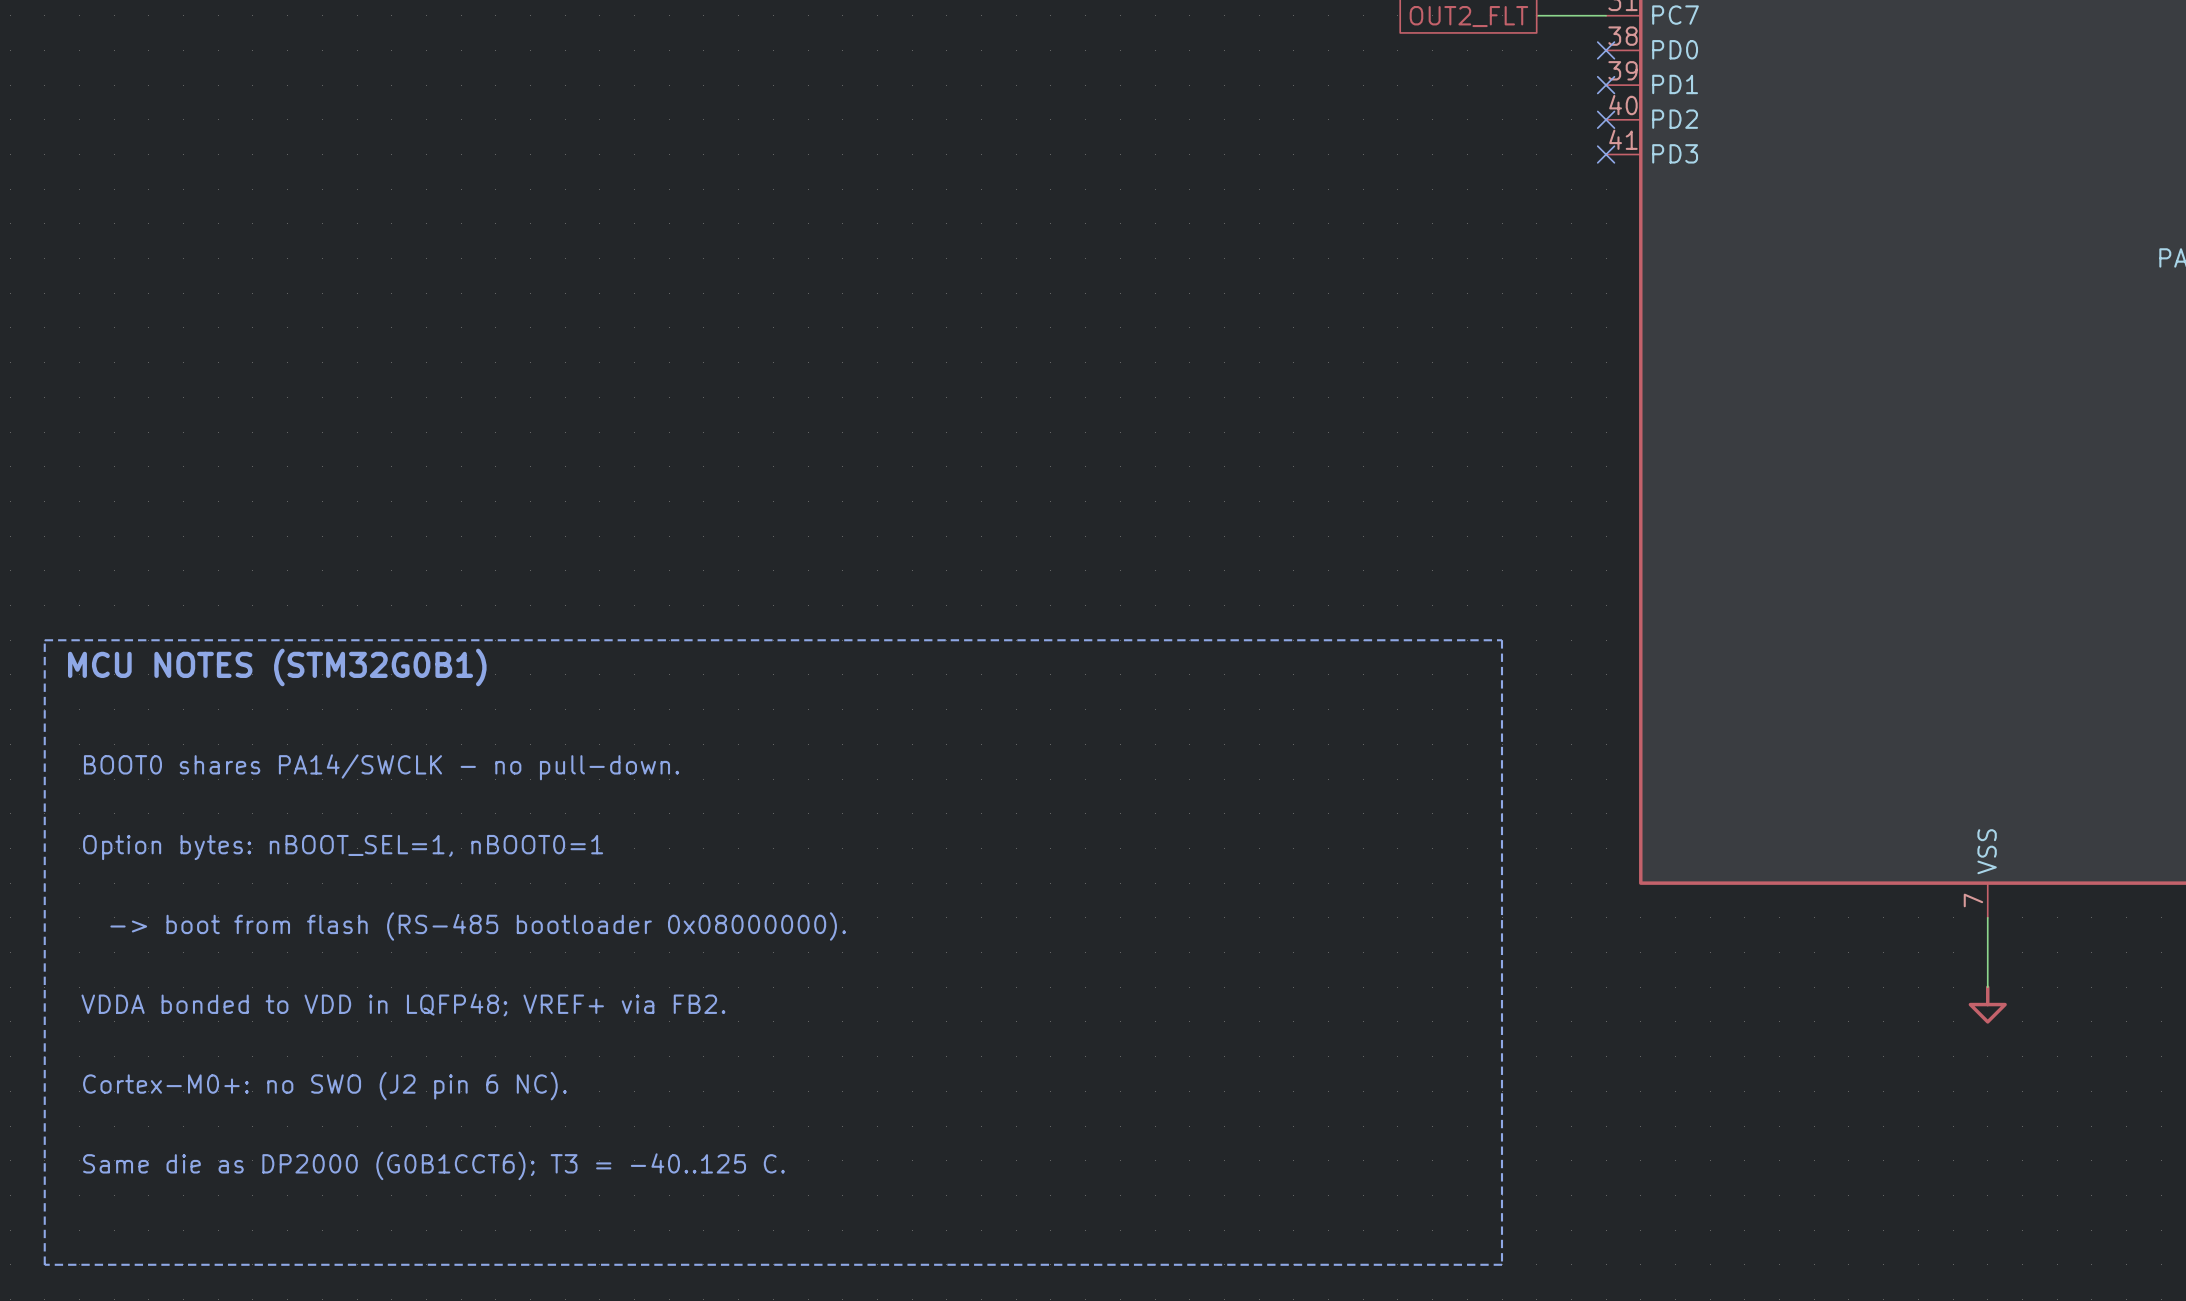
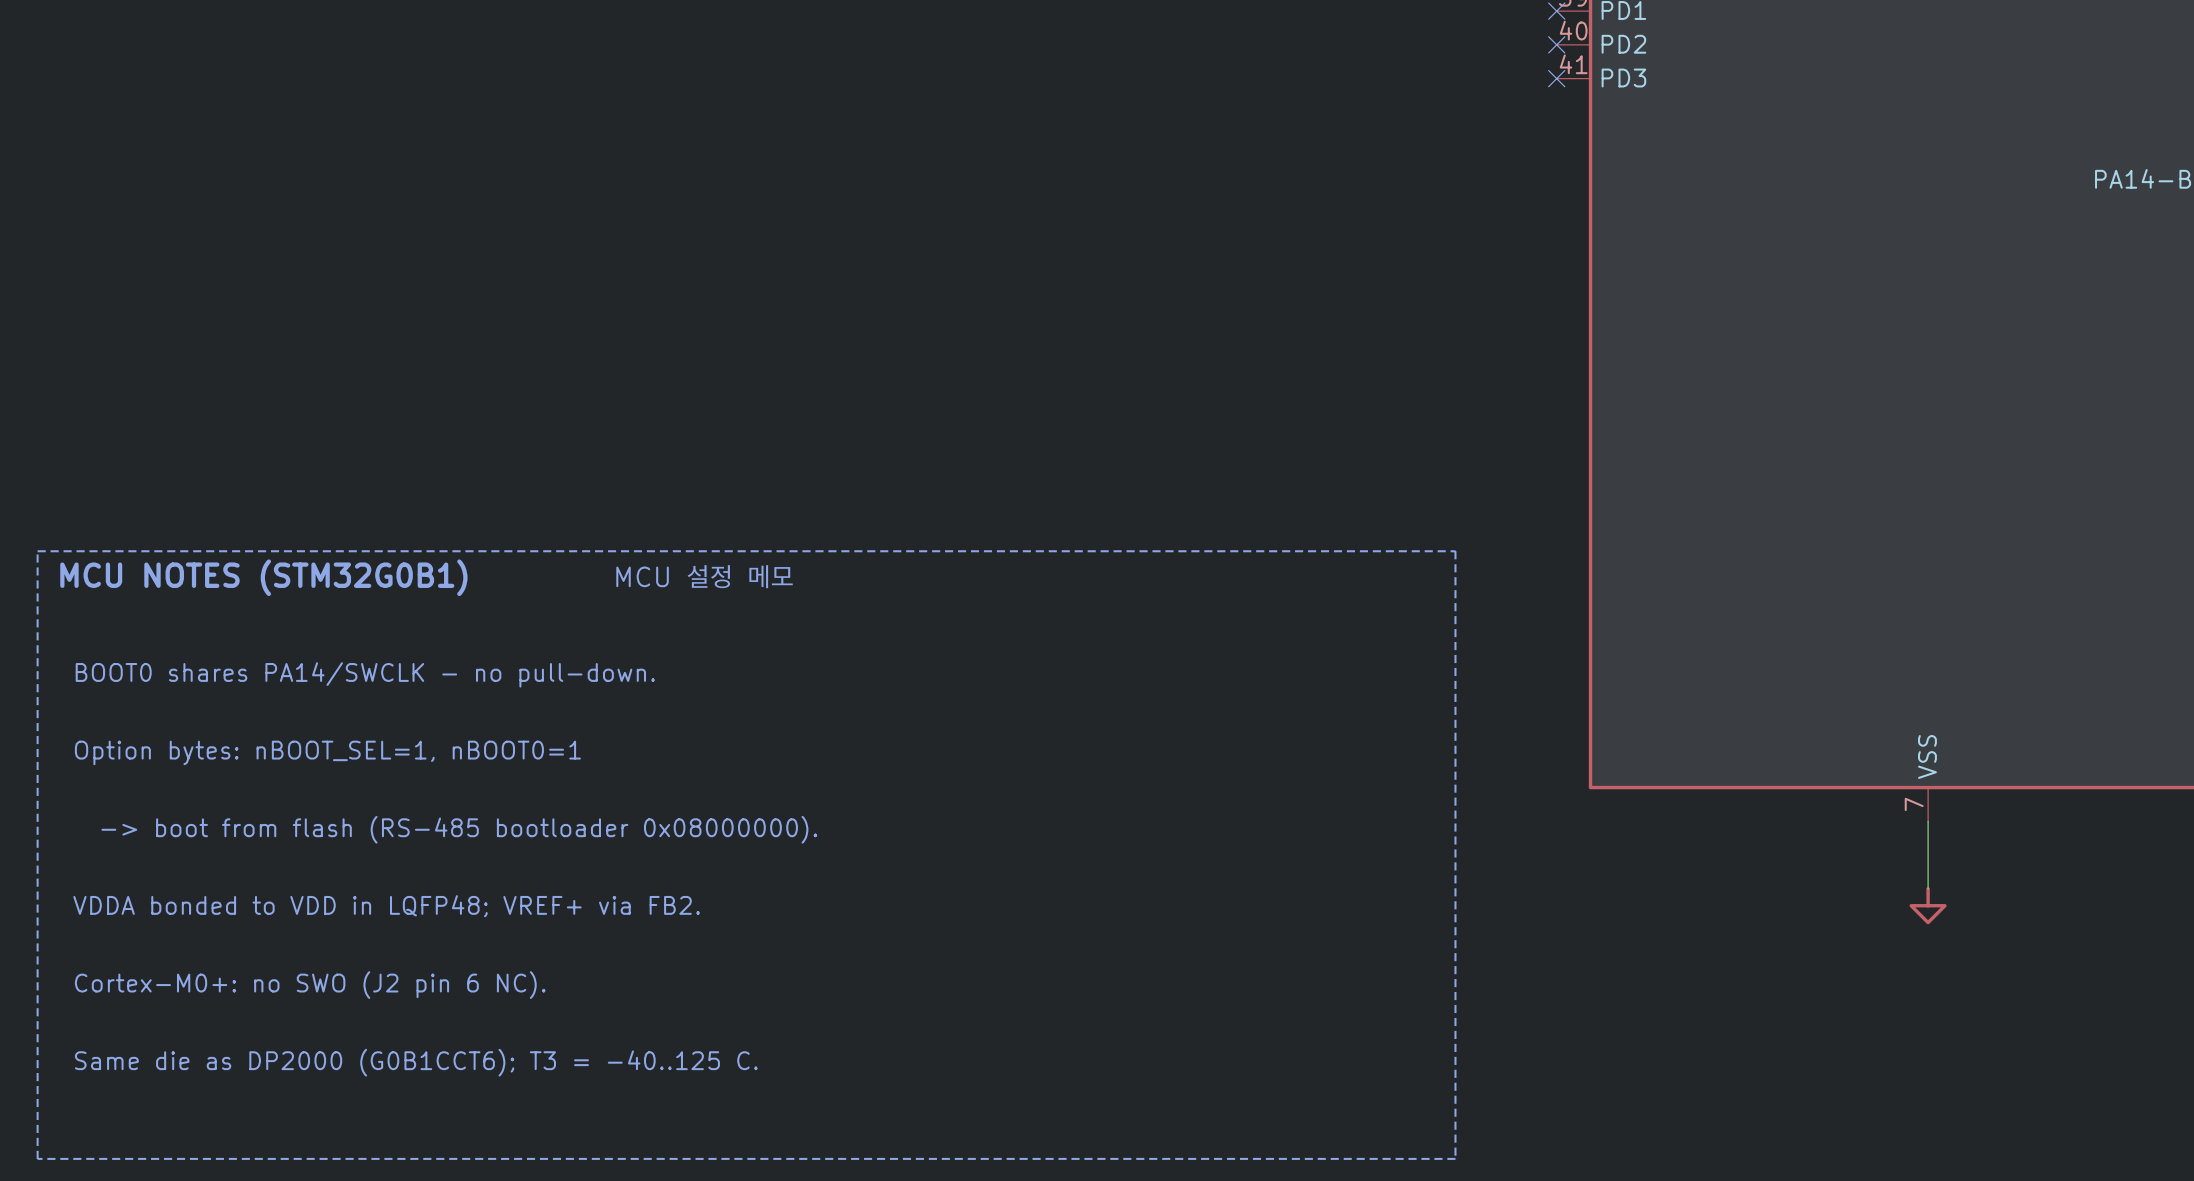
text: none -> MCU 설정 메모 (705, 576)

